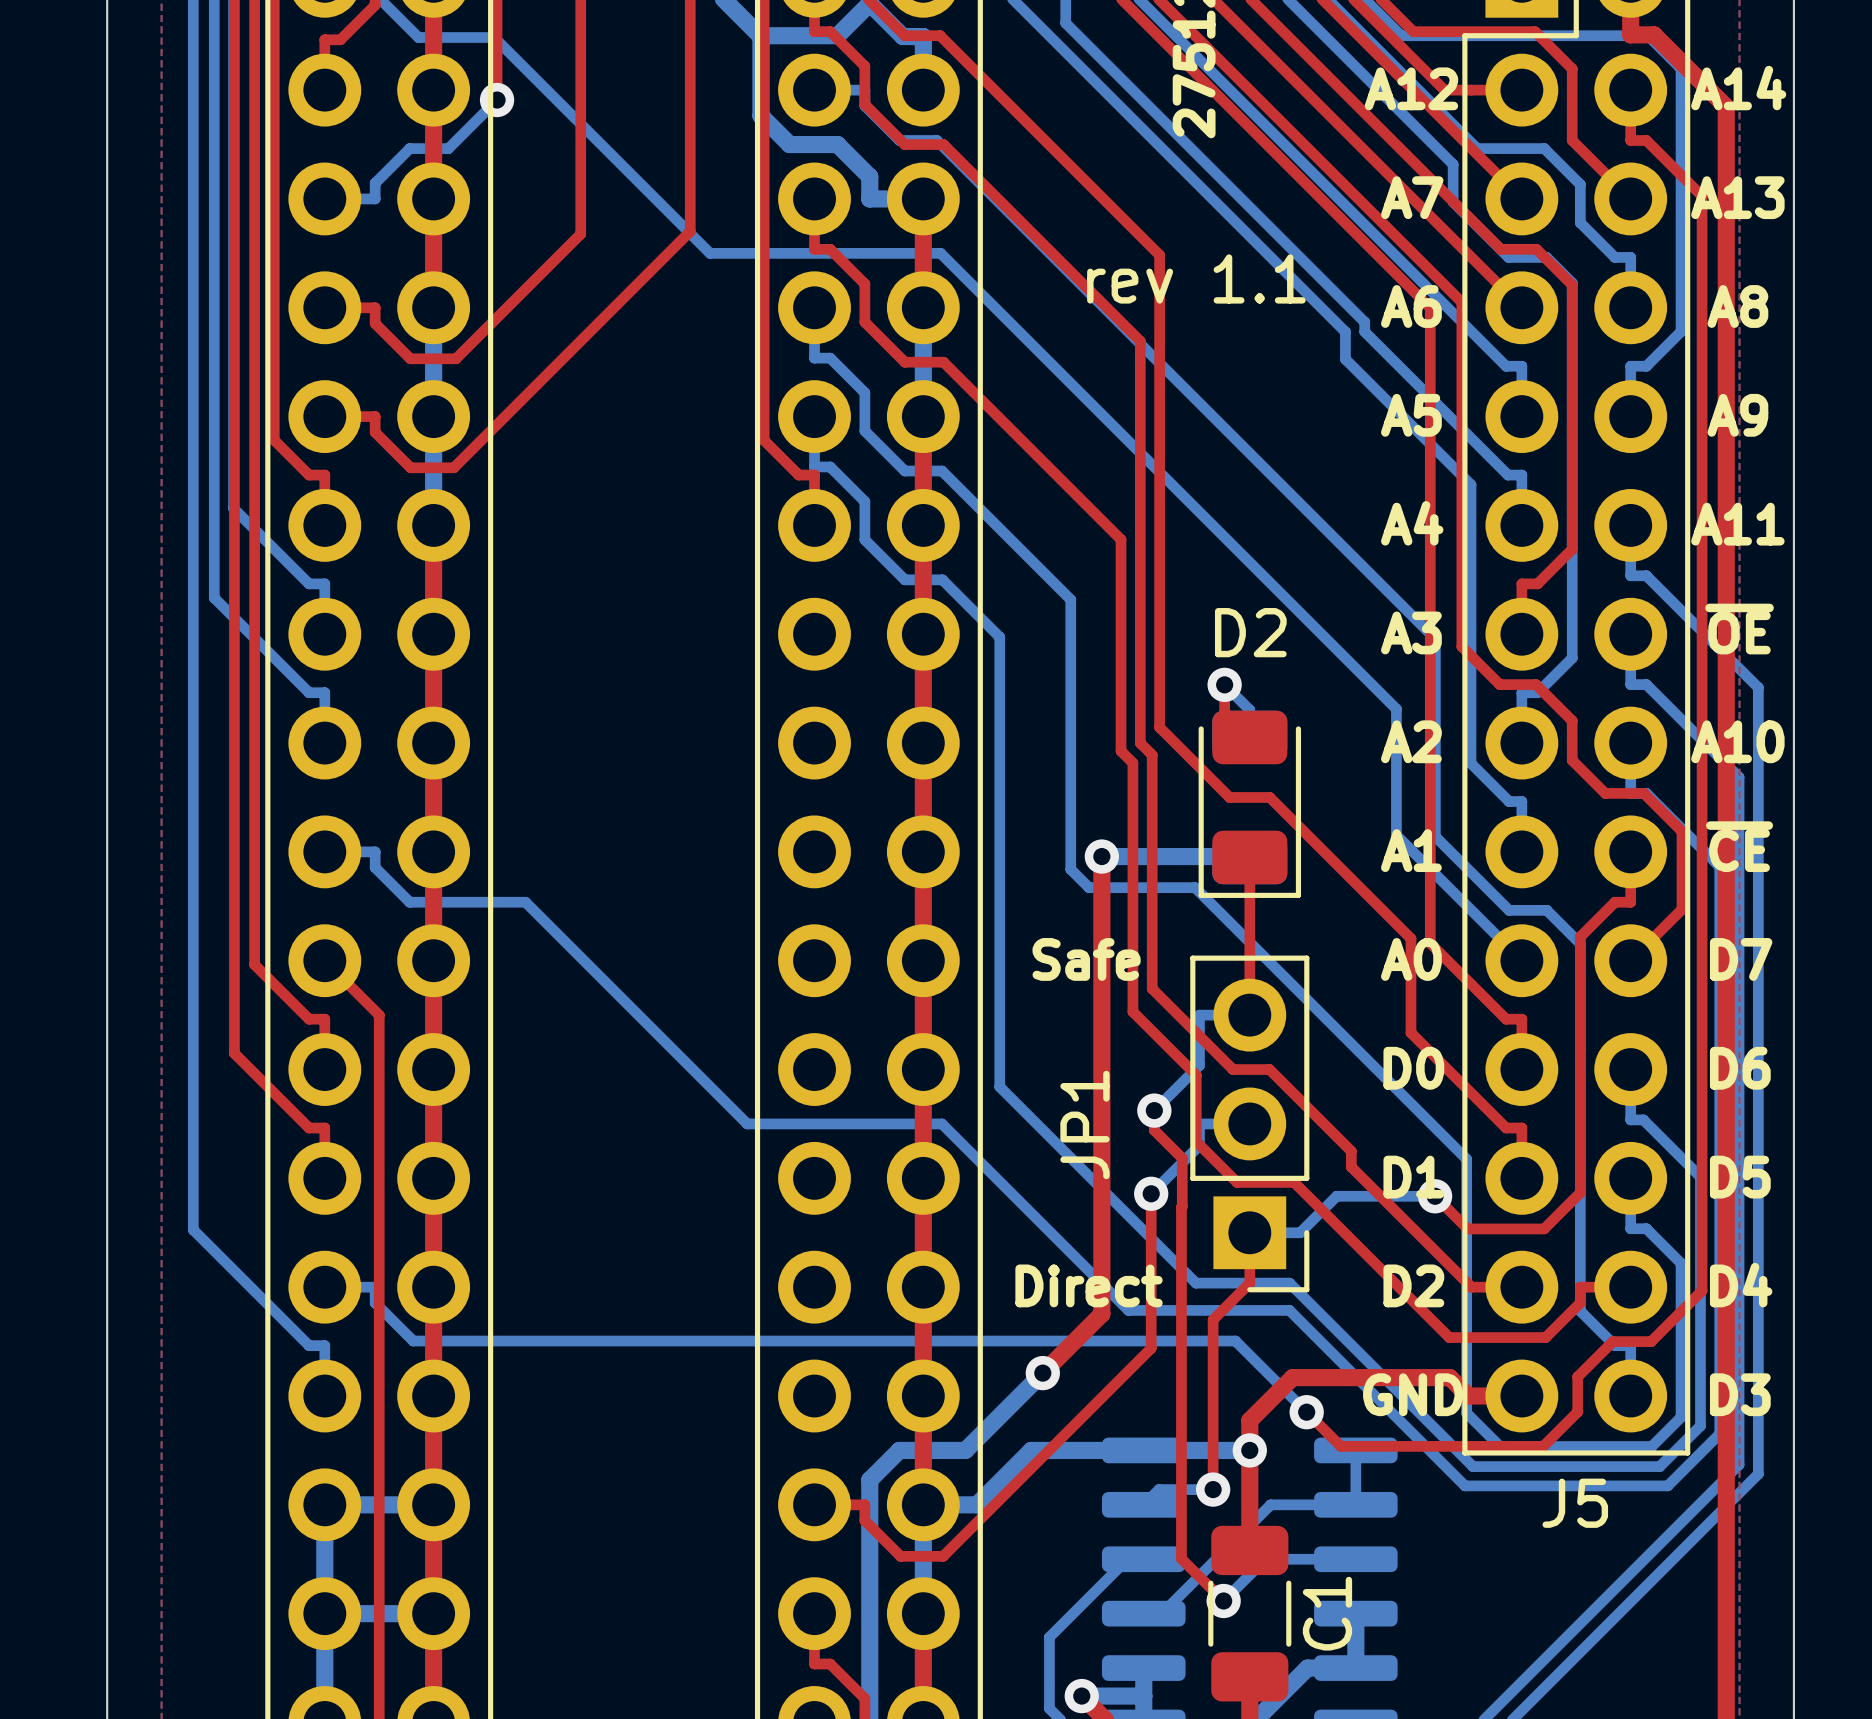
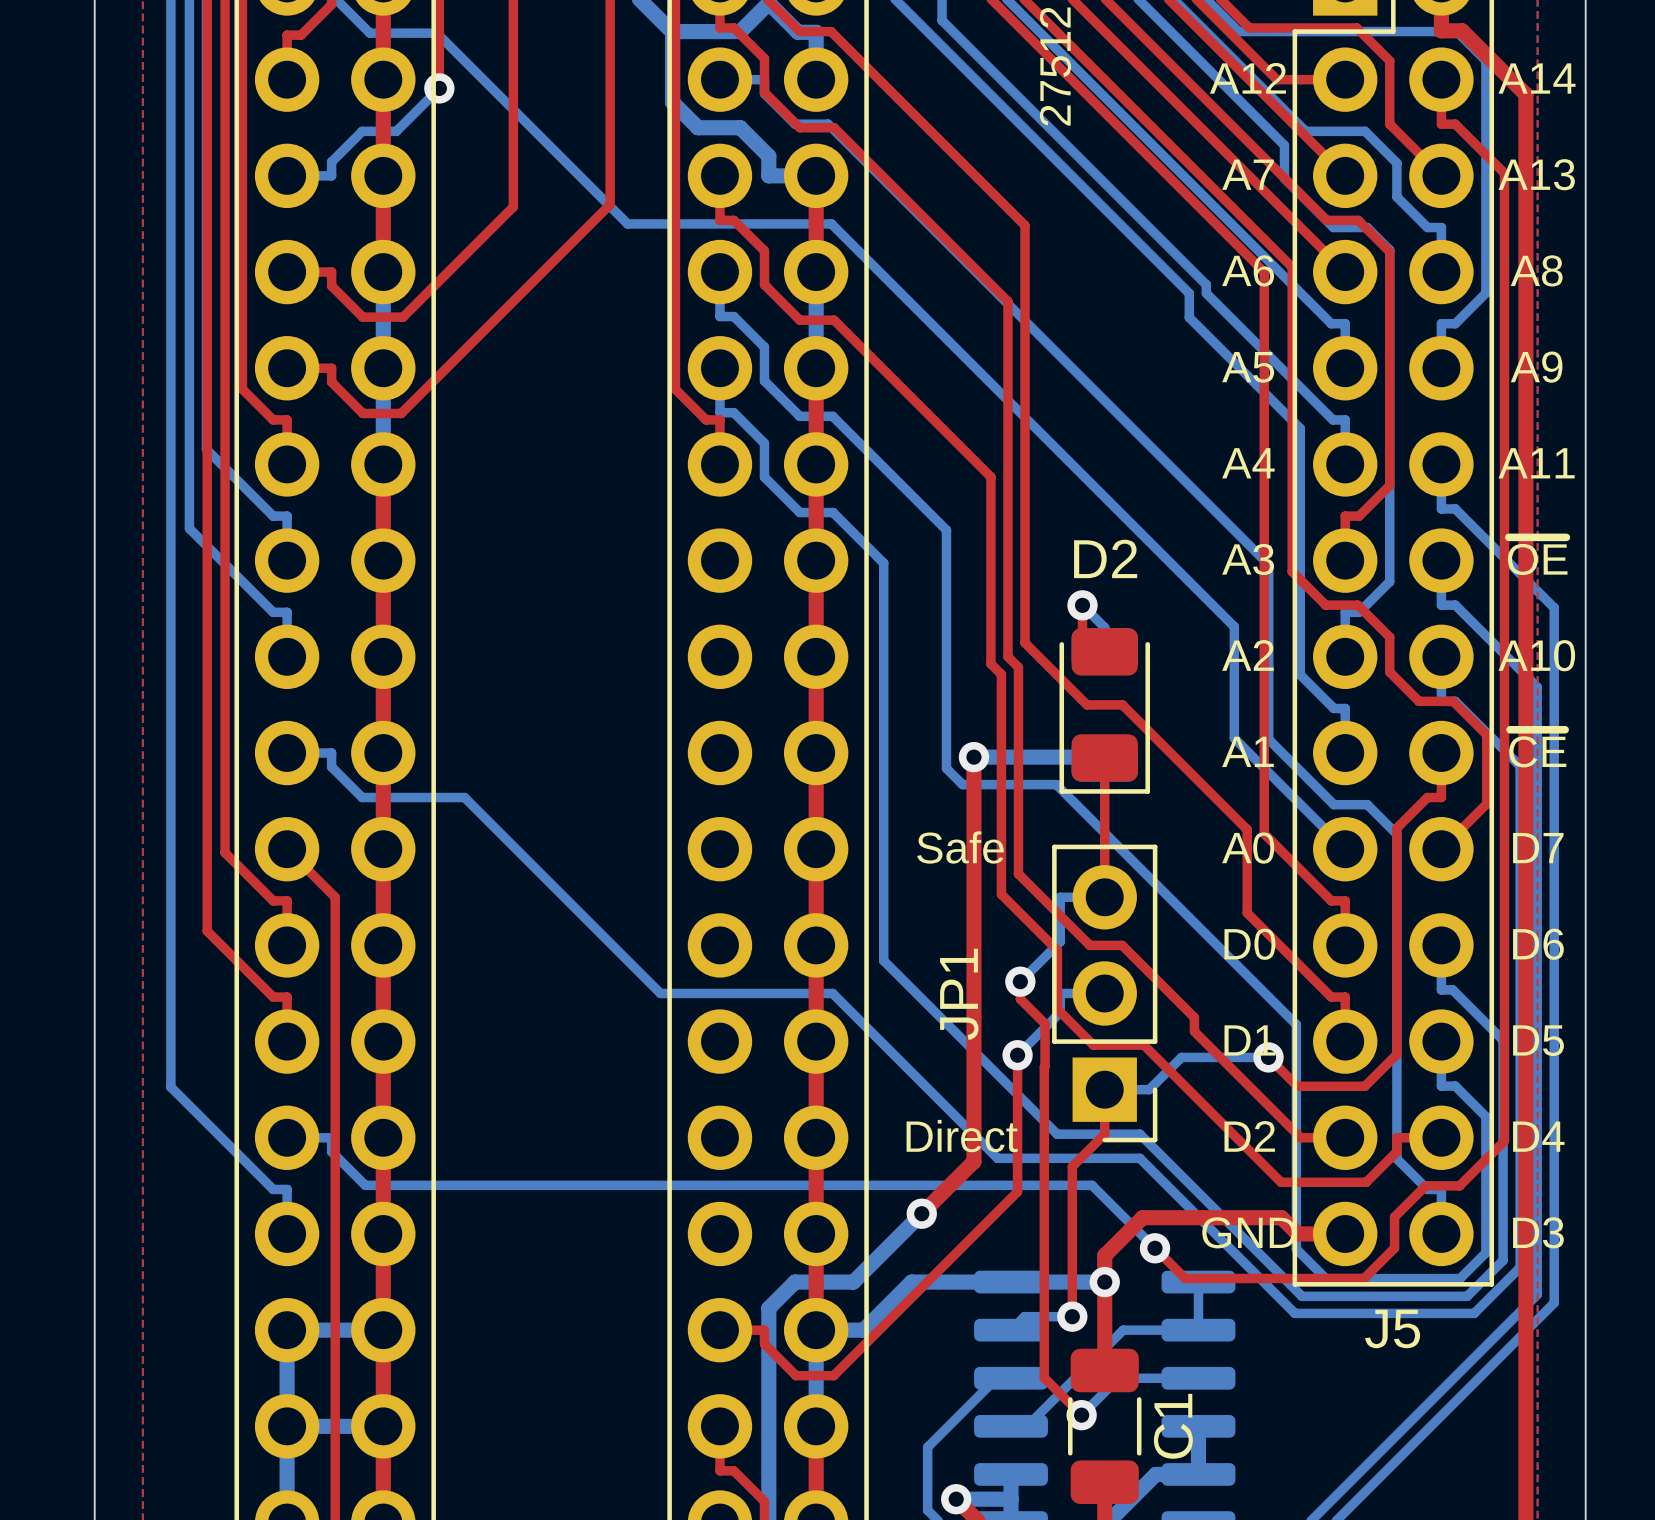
text: rev 1.1 (1196, 278) -> none

